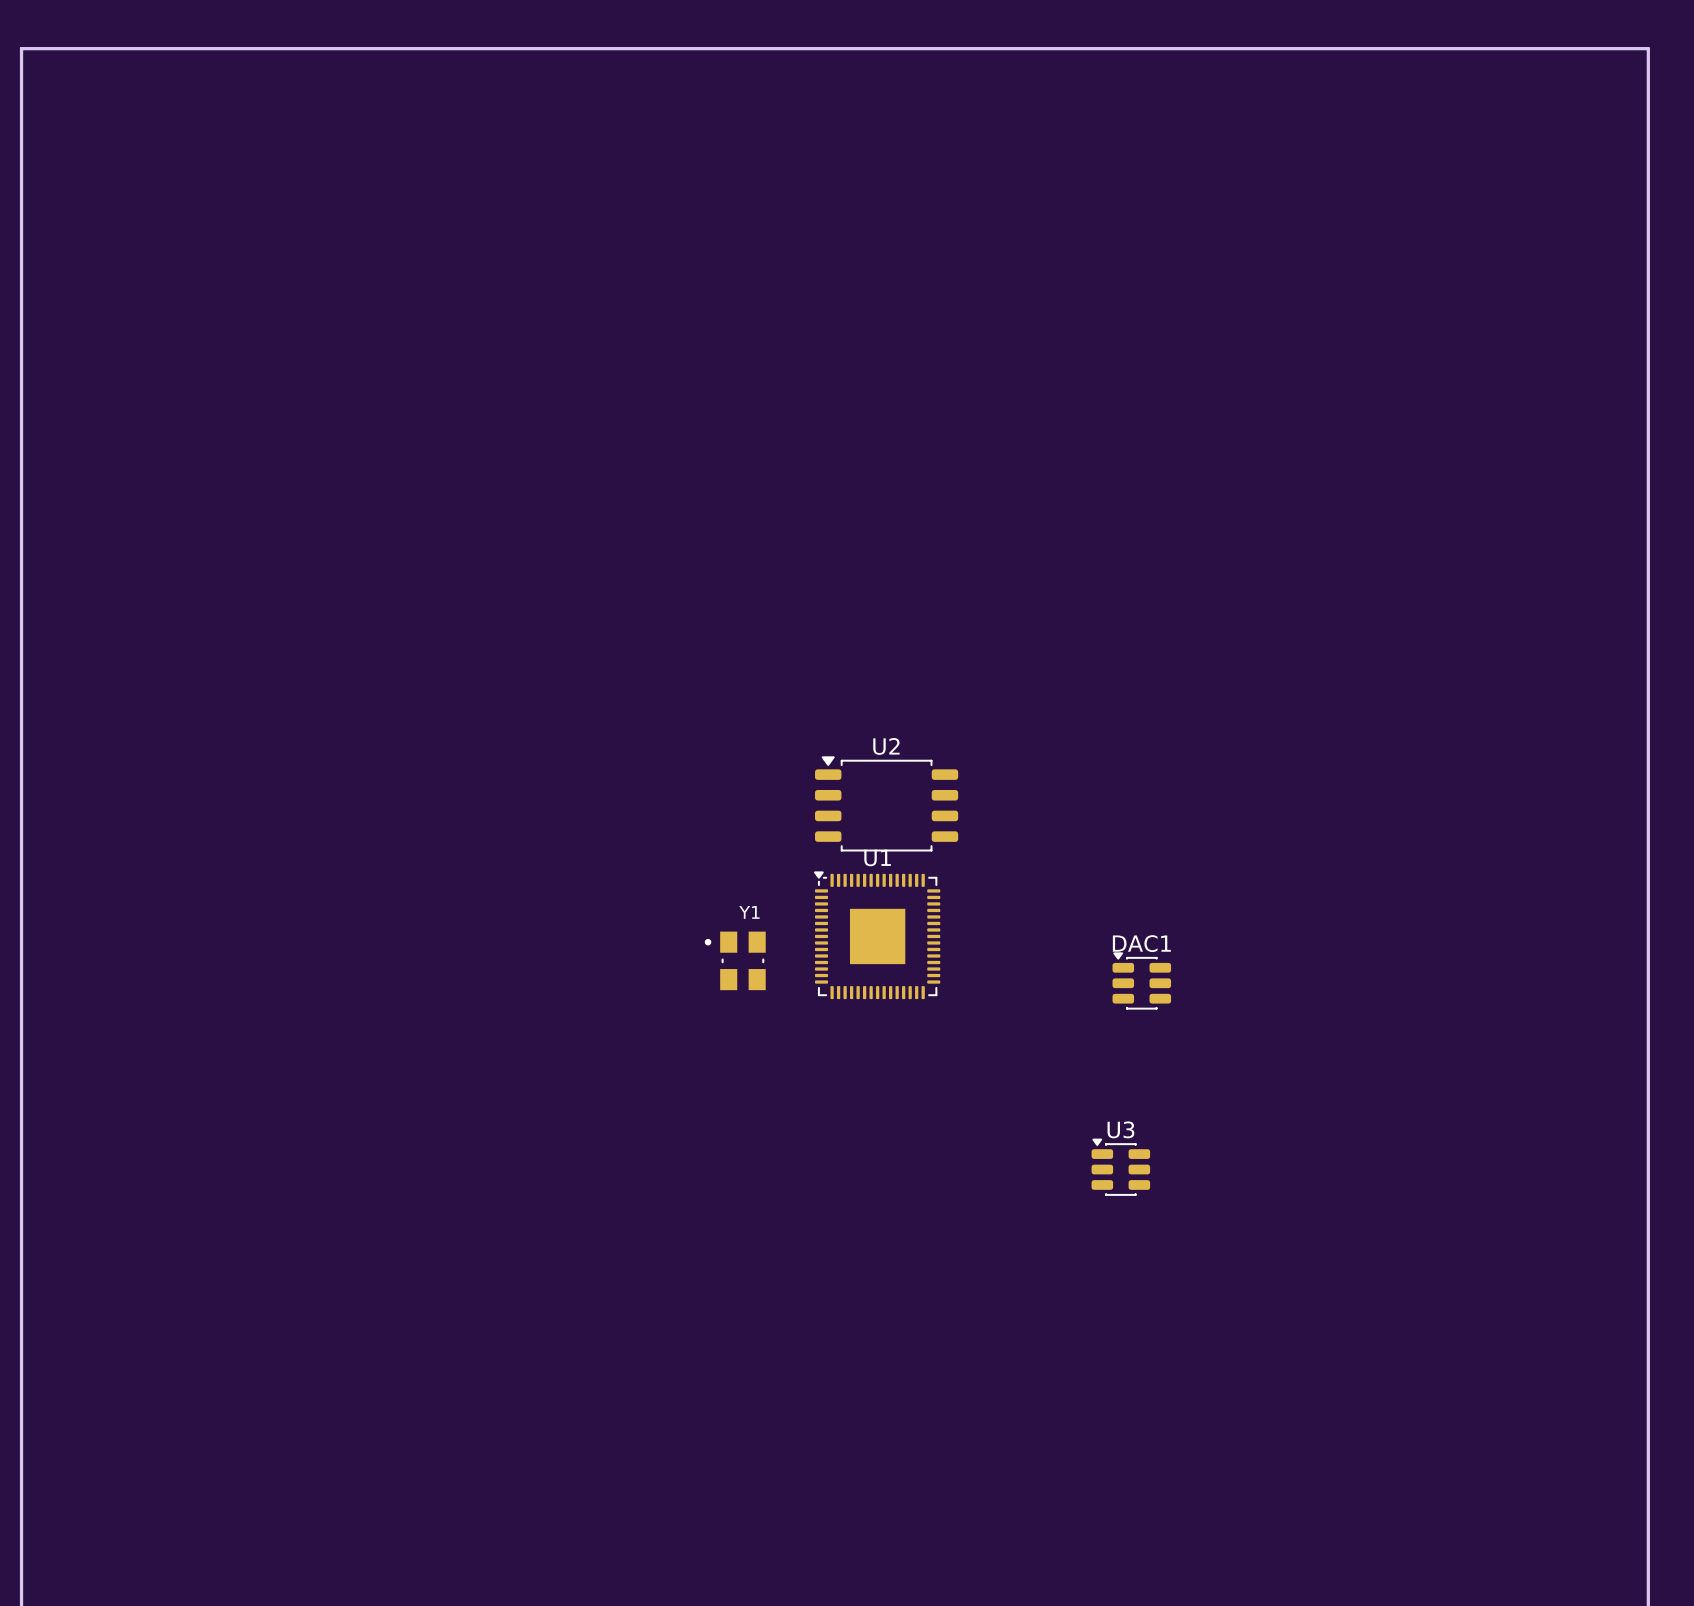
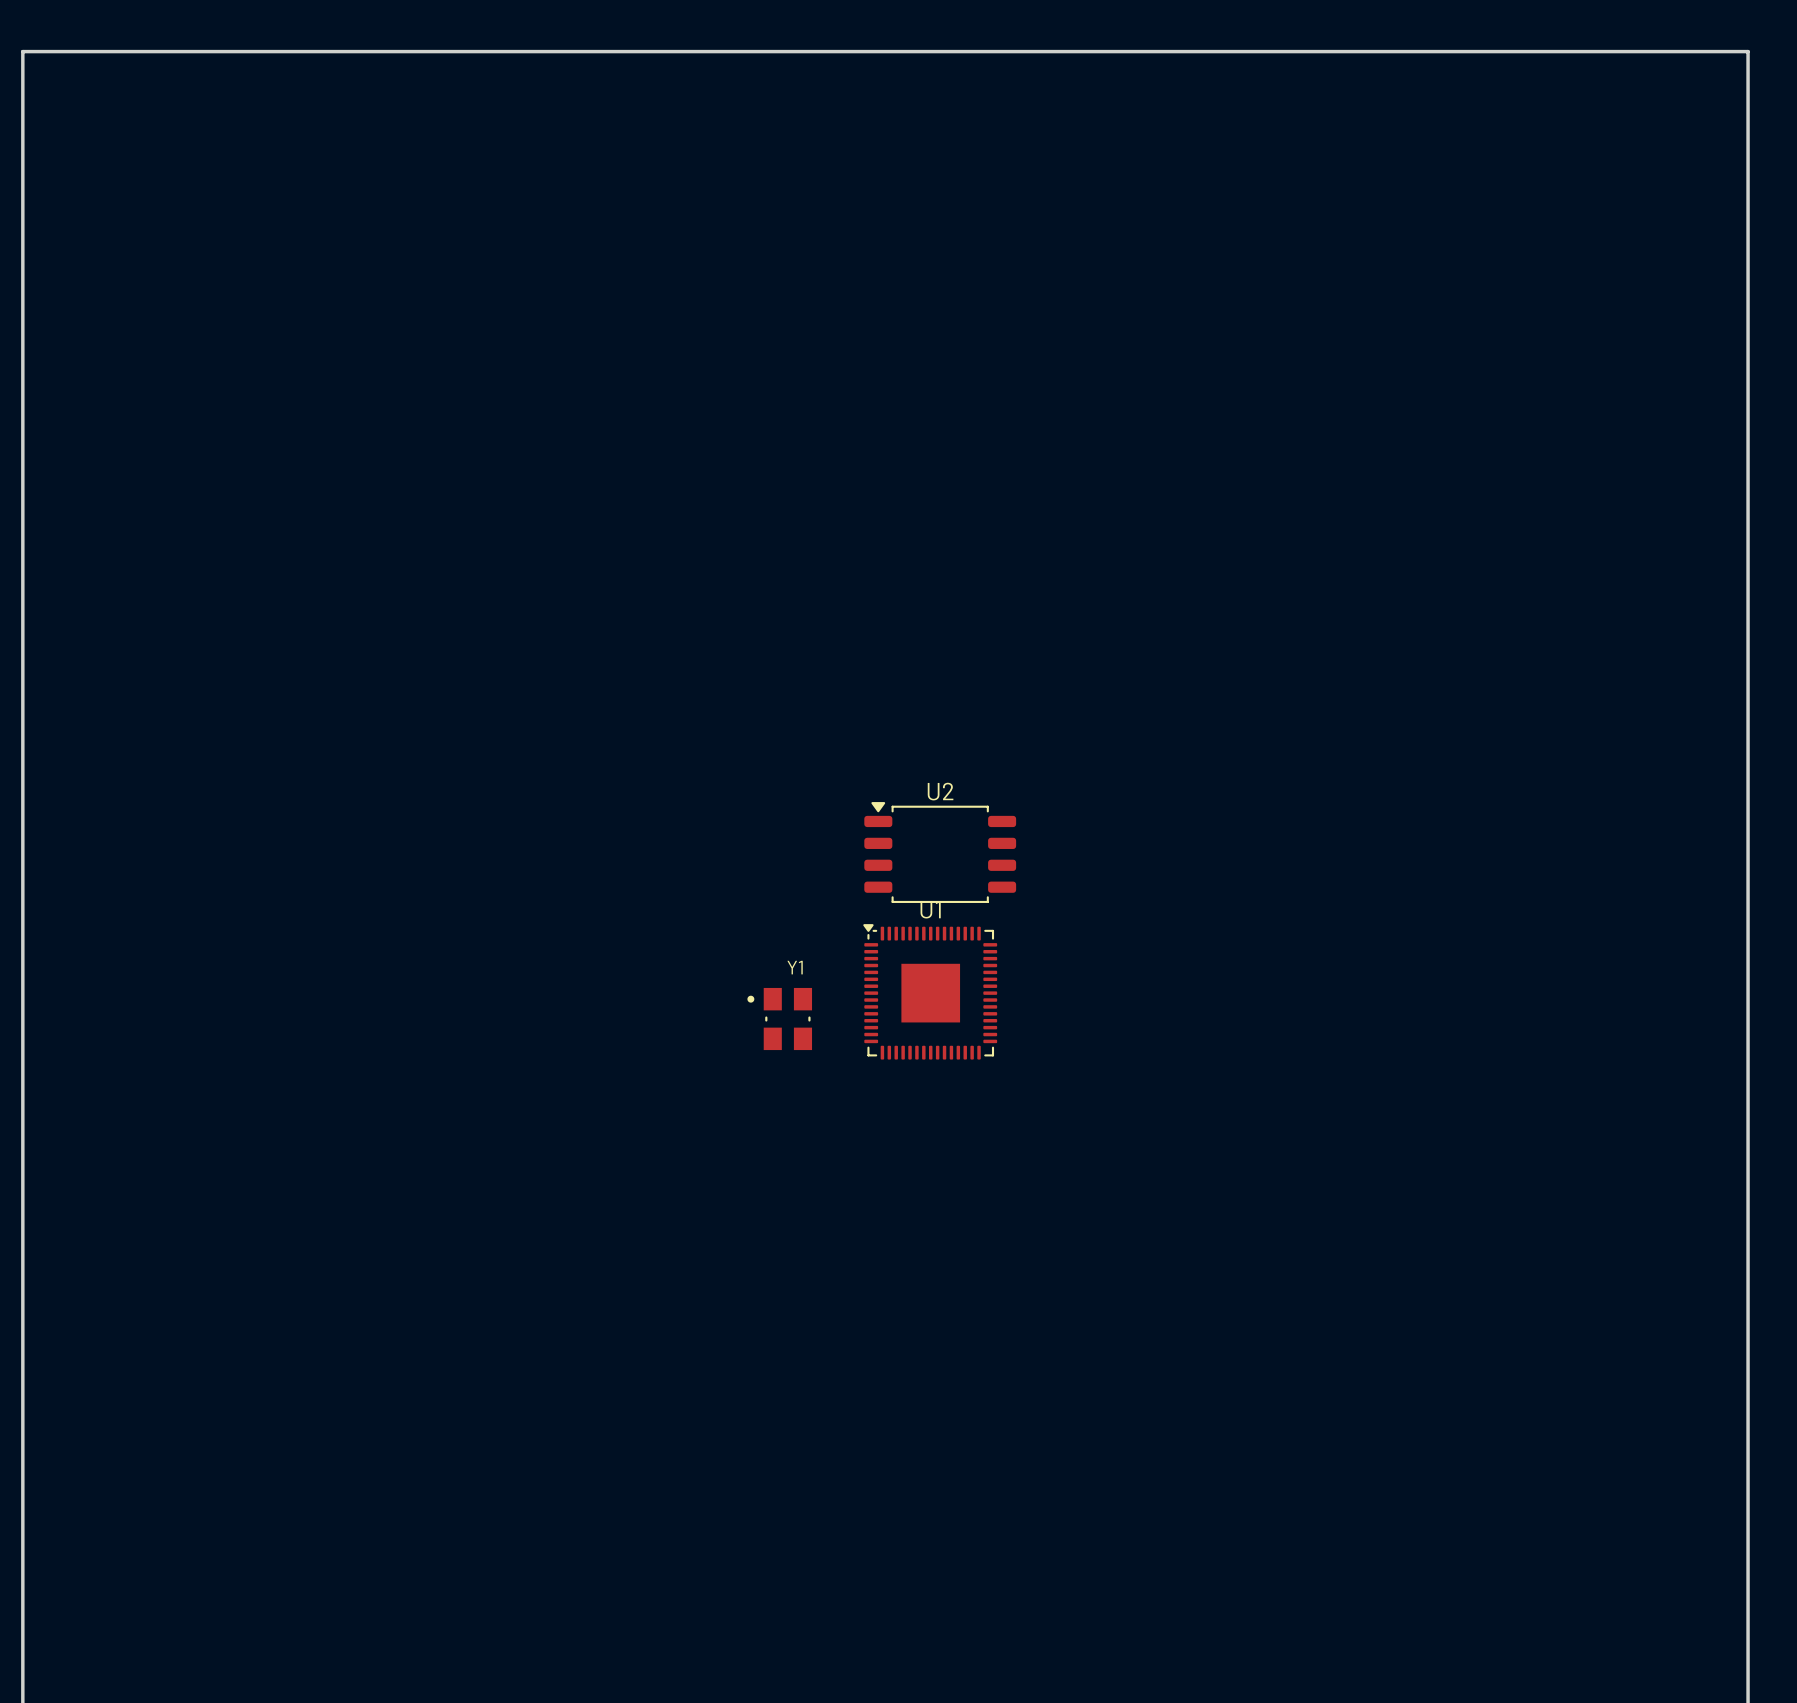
DAC1: (1141, 980) -> none
U3: (1120, 1167) -> none

